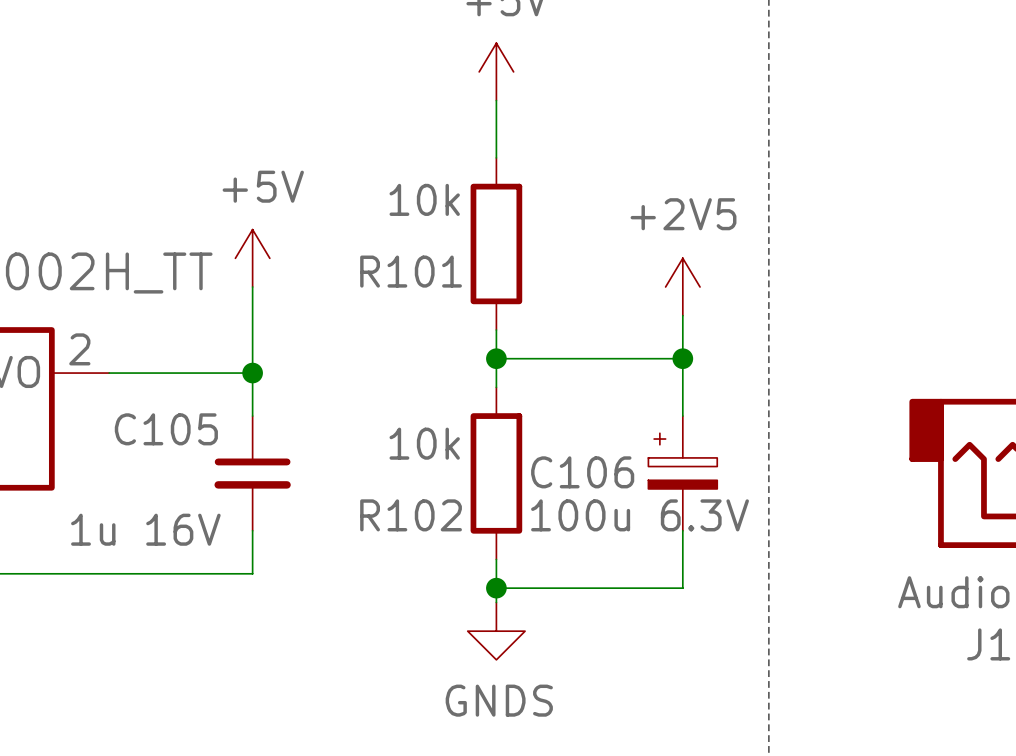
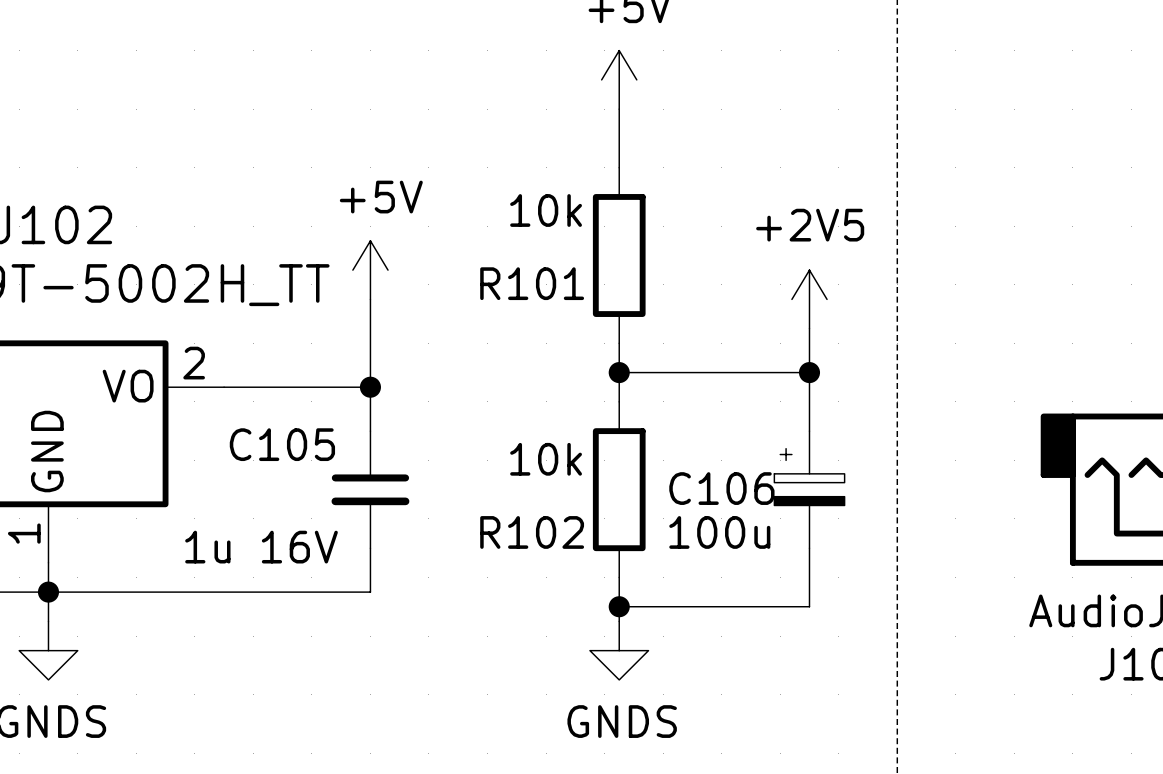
C106 name position: C106 (582, 472) -> C106 (721, 488)
C106 value: 100u 6.3V (640, 515) -> 100u (719, 532)

